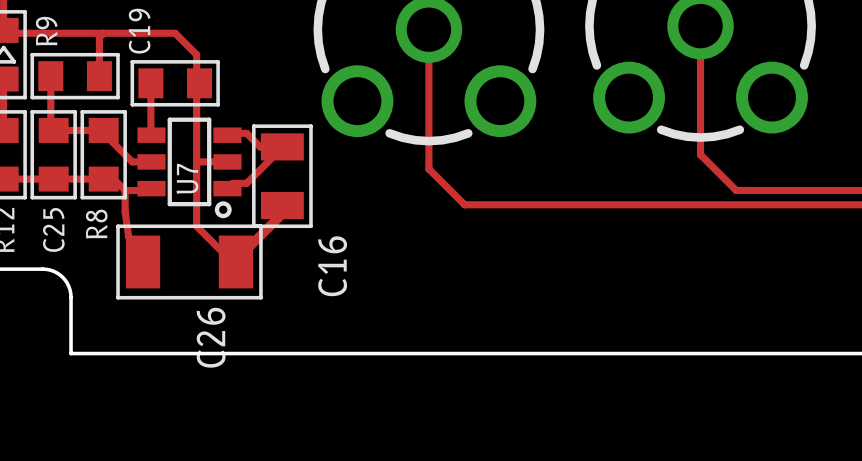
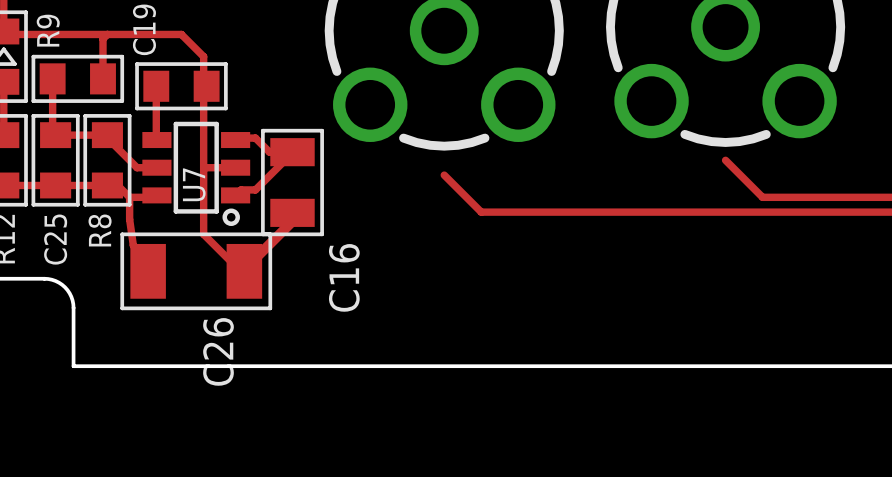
track: (700, 26) (700, 154) -> none
track: (428, 29) (428, 169) -> none

